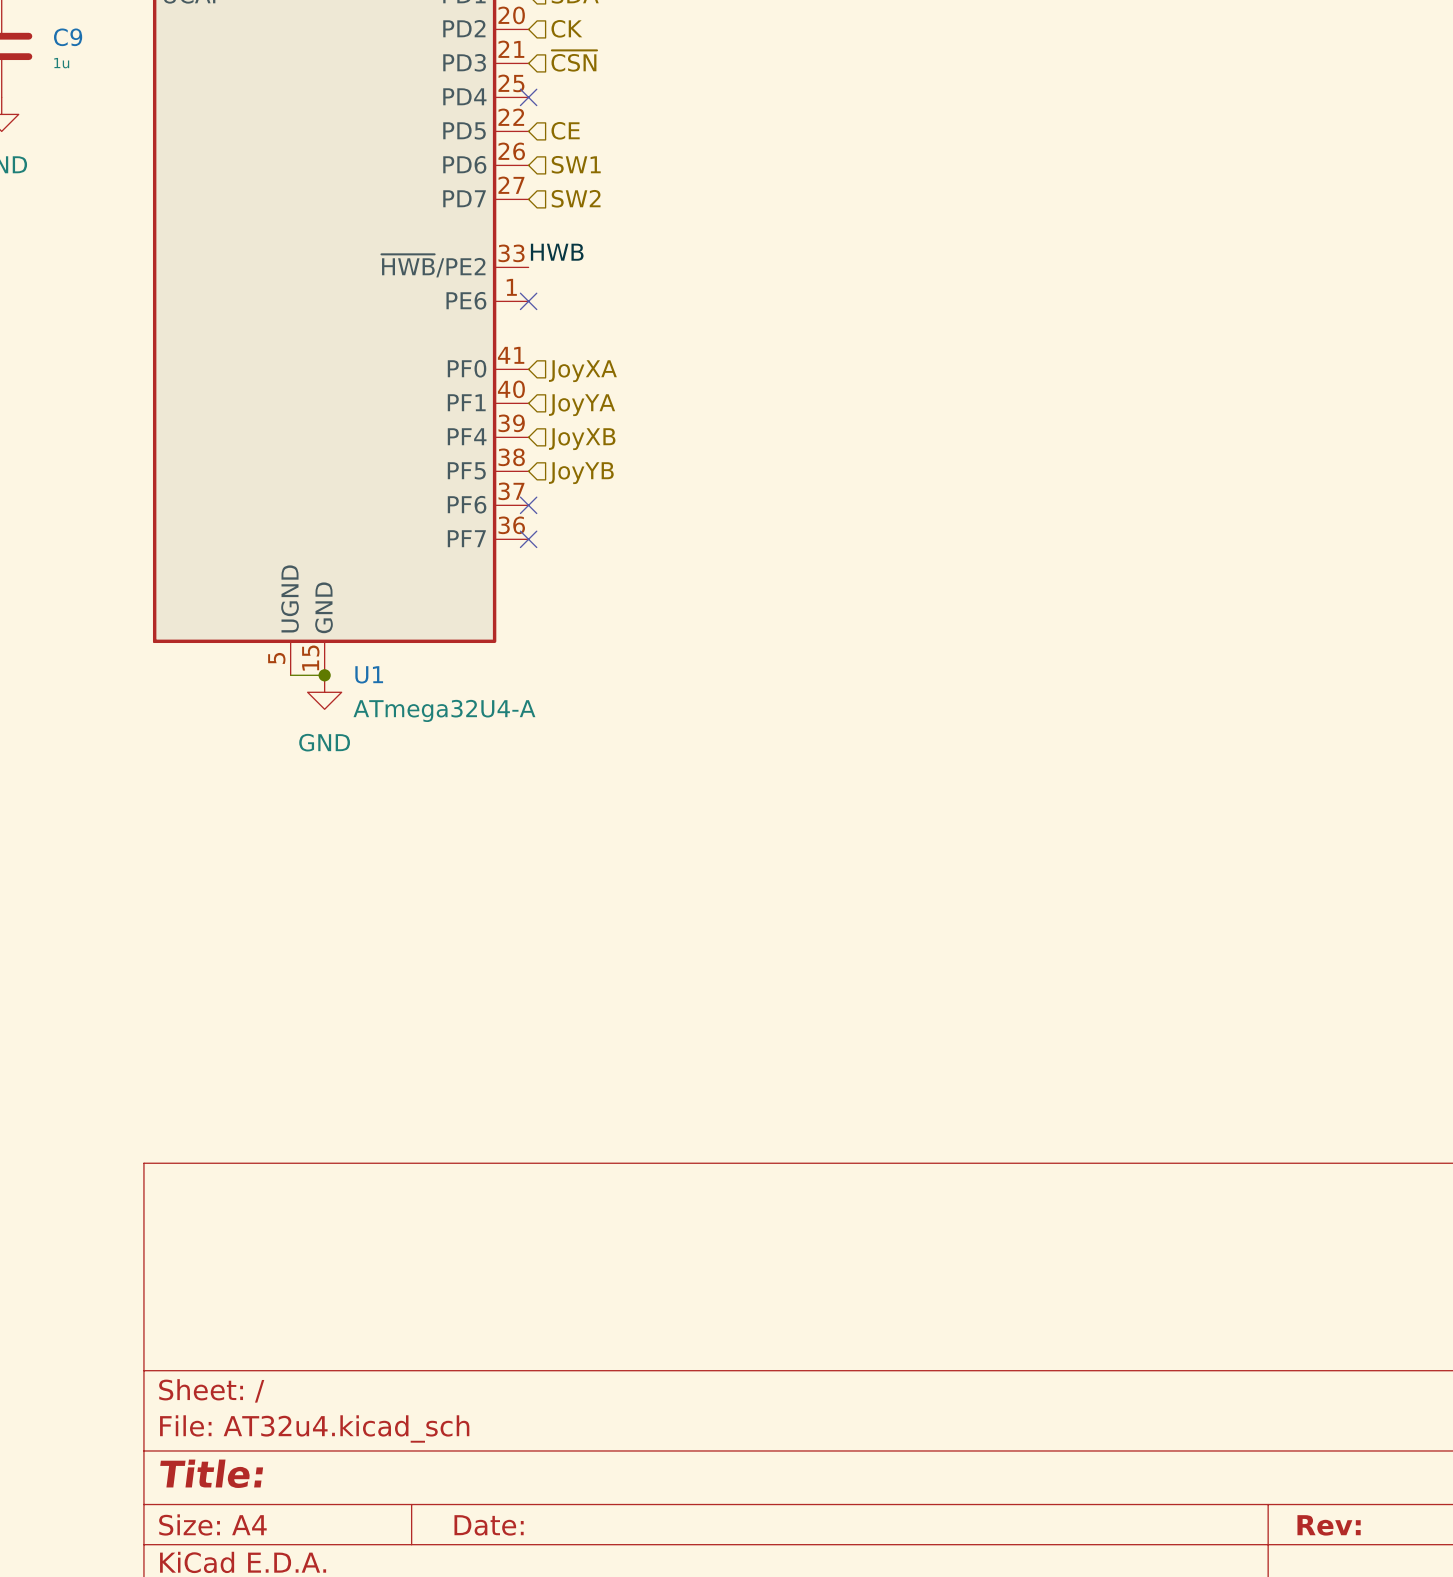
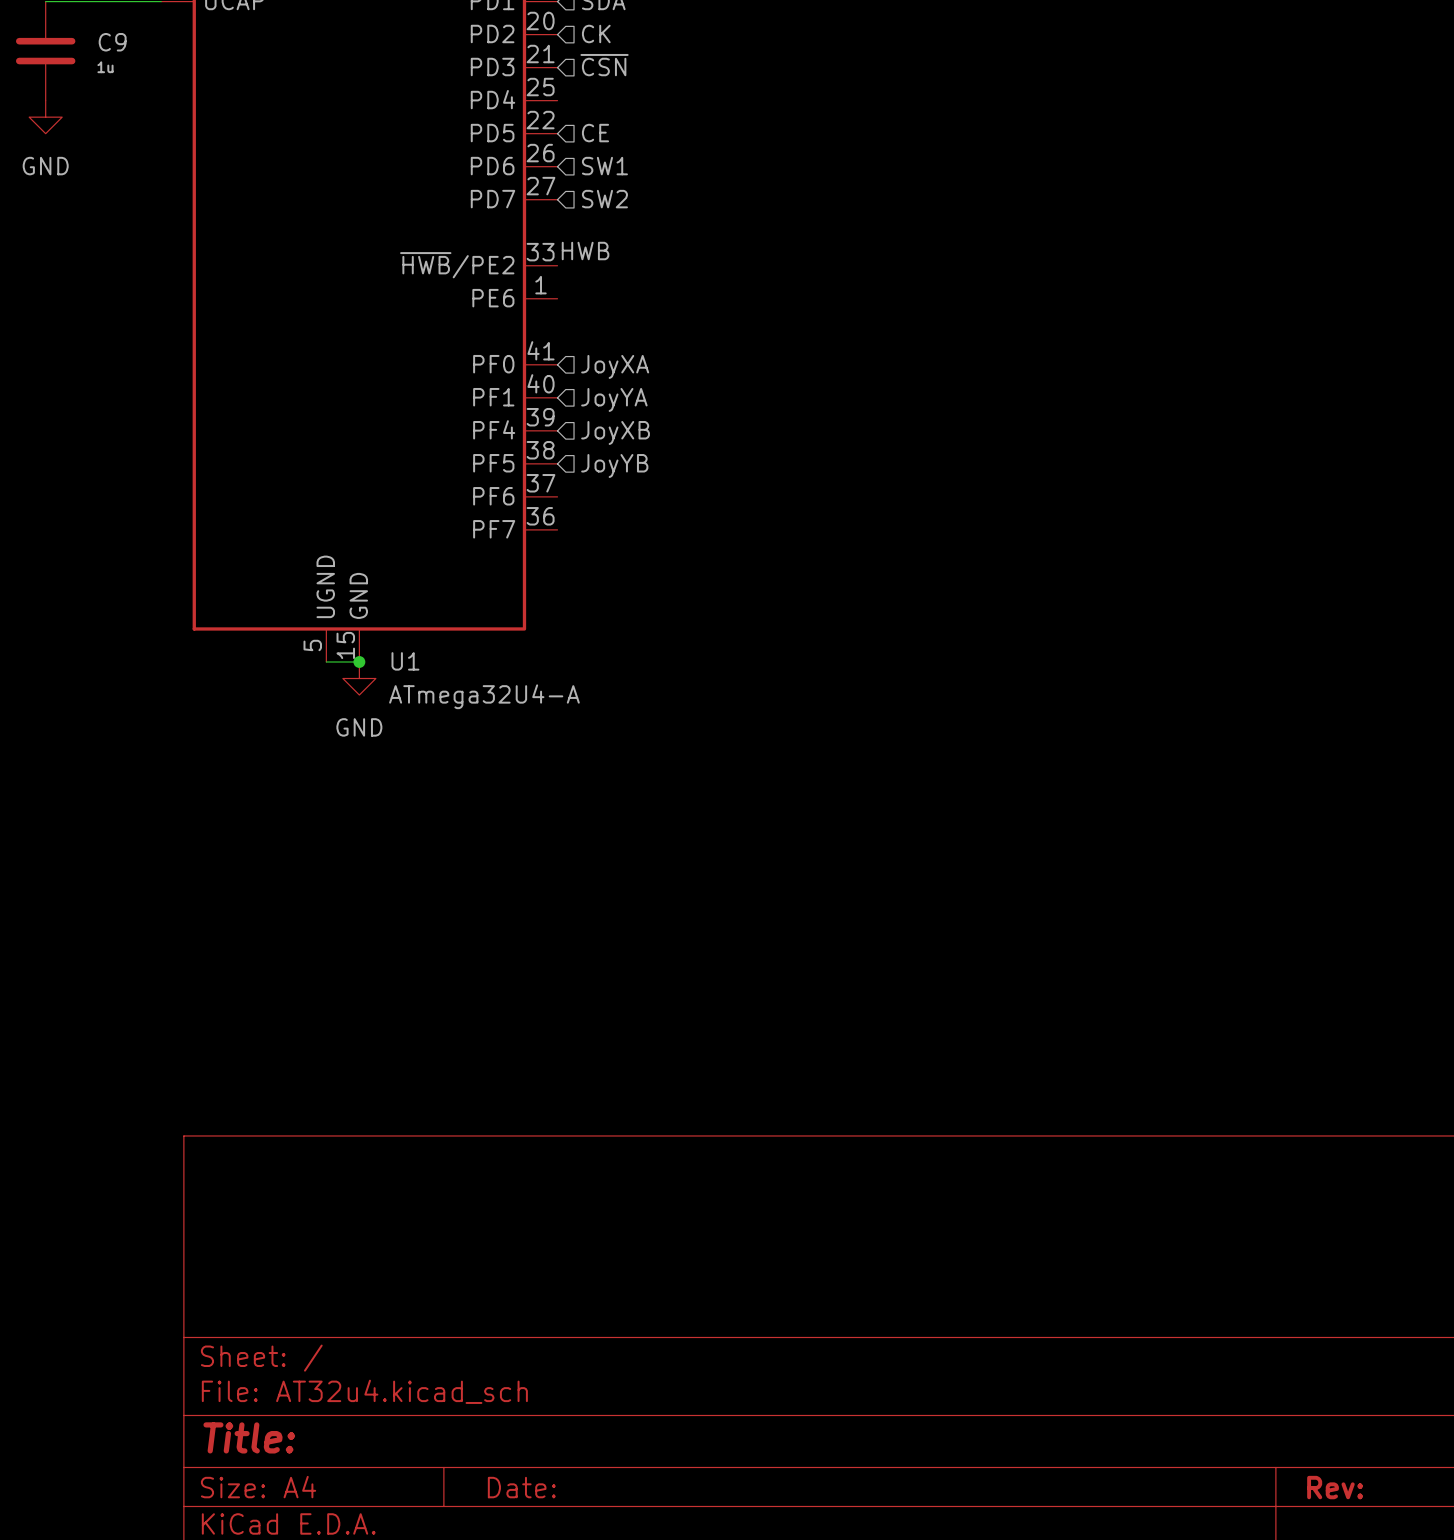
no-connect mark: (528, 97) -> none
no-connect mark: (528, 301) -> none
no-connect mark: (528, 505) -> none
no-connect mark: (528, 539) -> none

